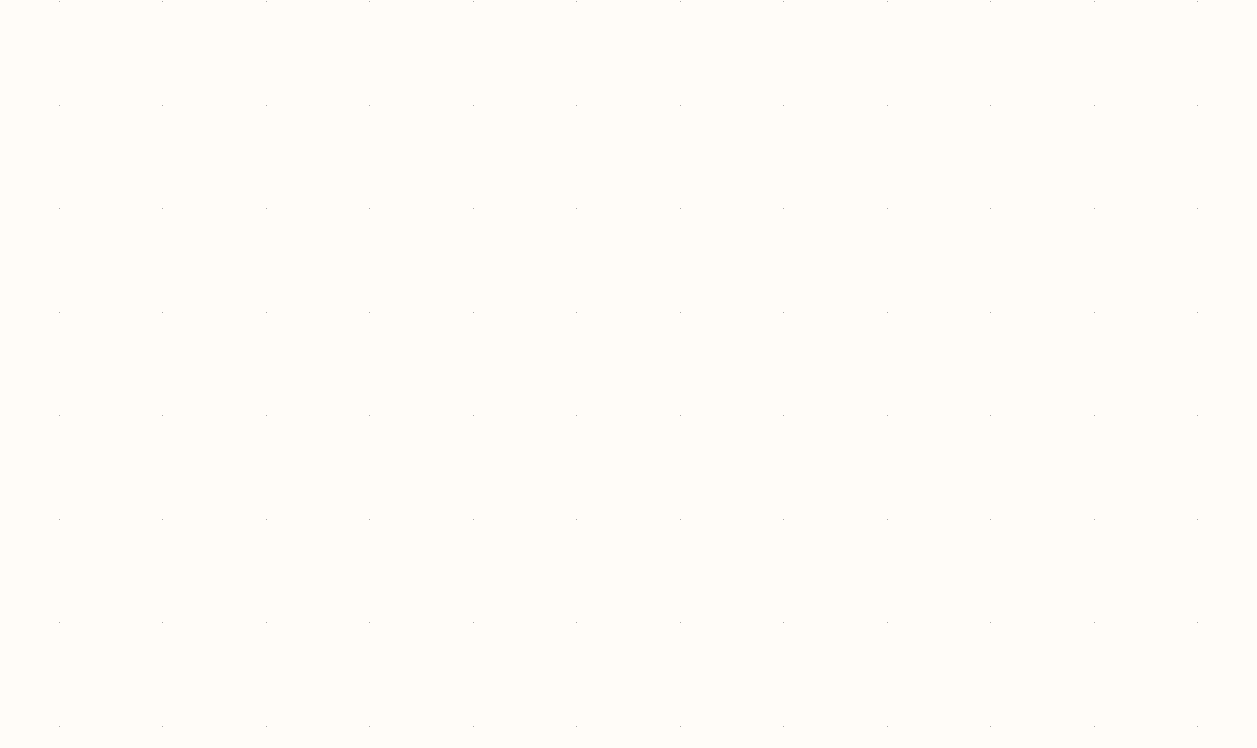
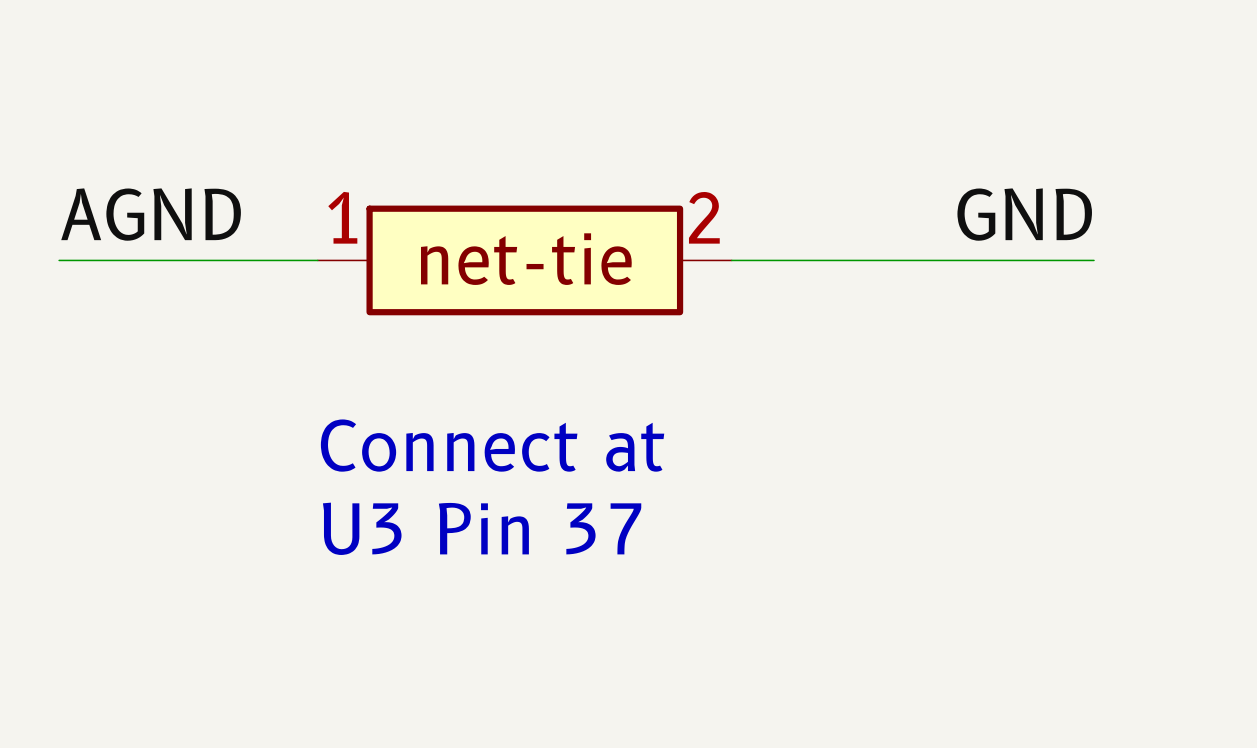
label: none -> AGND (151, 214)
label: none -> GND (1024, 214)
wire: none -> (59, 260) (317, 260)
part: none -> (524, 260)
wire: none -> (731, 260) (1094, 260)
text: none -> Connect at (492, 445)
text: none -> U3 Pin 37 (482, 528)

